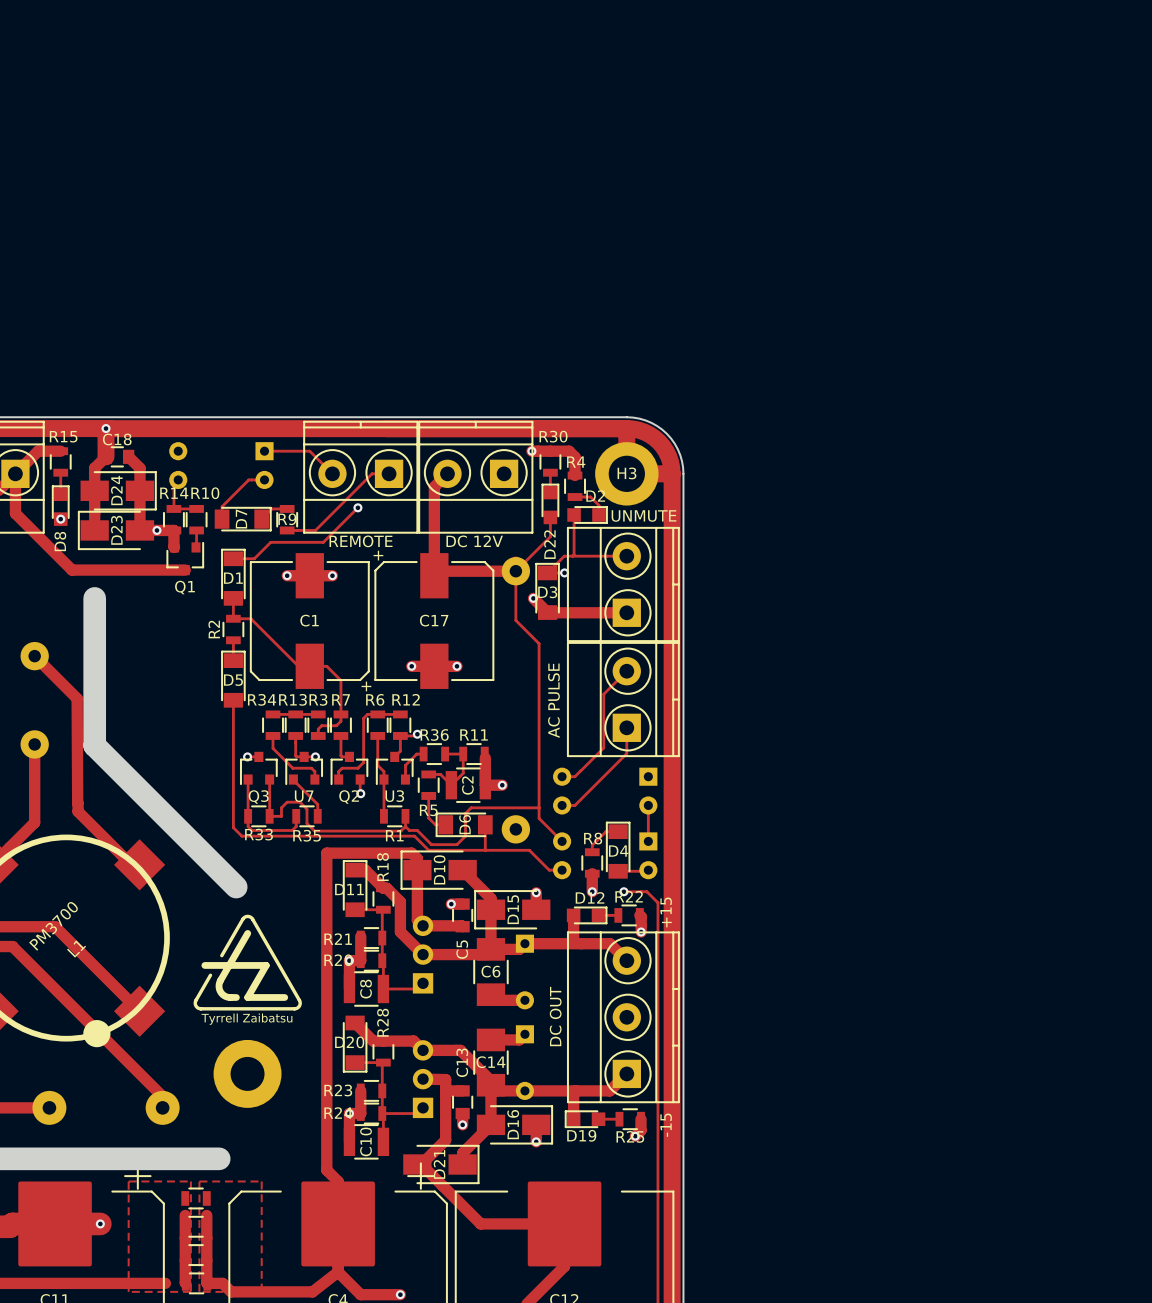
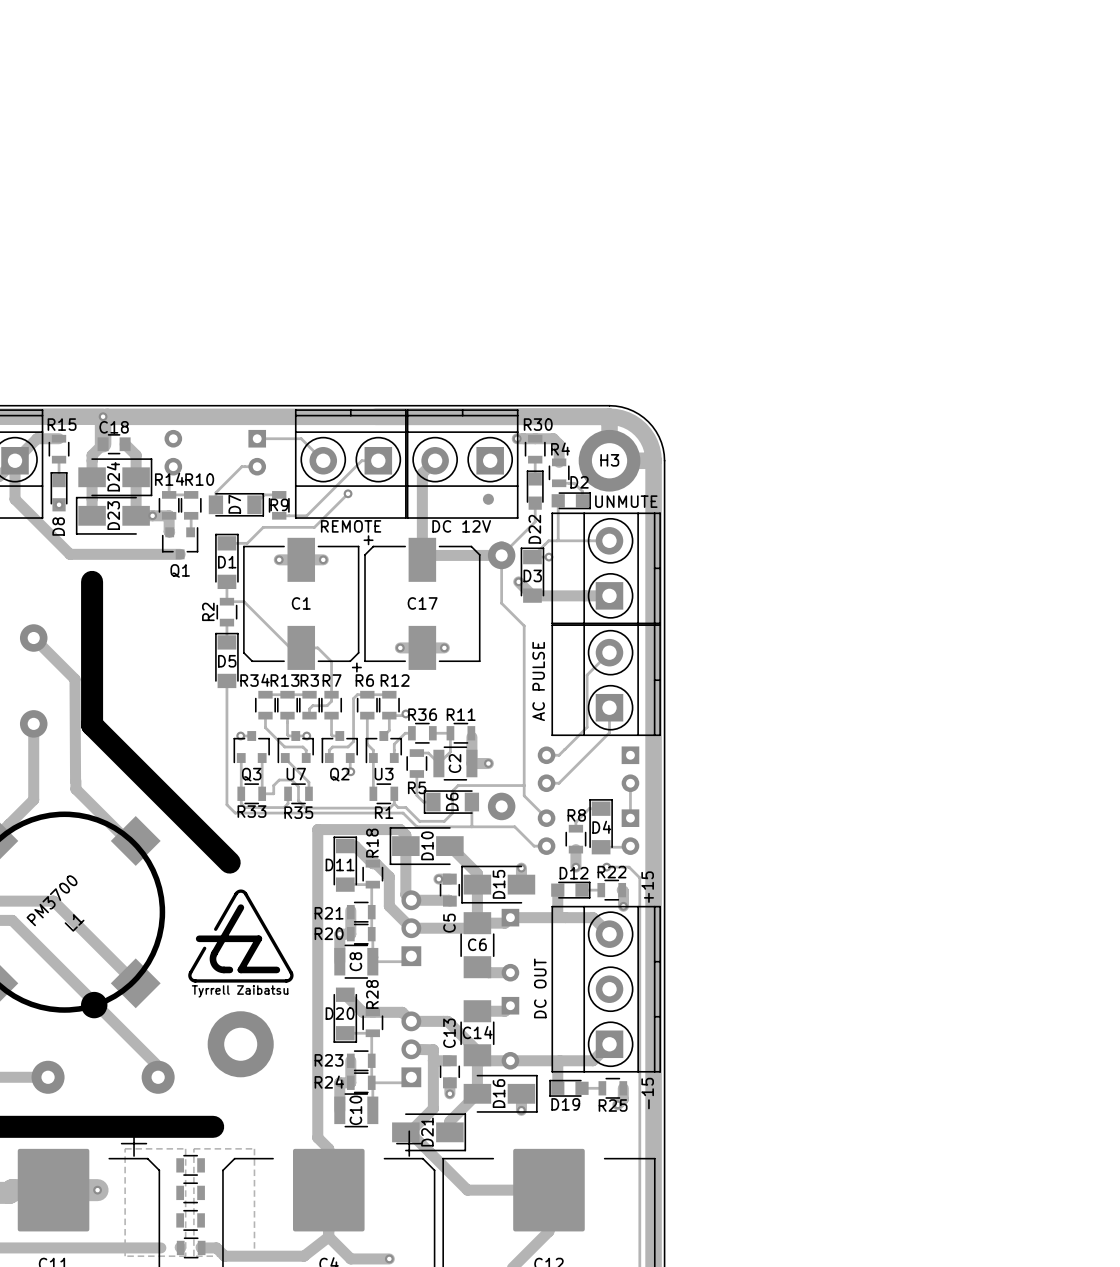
part: none -> (488, 499)
track: (185, 1215) (185, 1282) -> none
track: (206, 1215) (206, 1282) -> none

